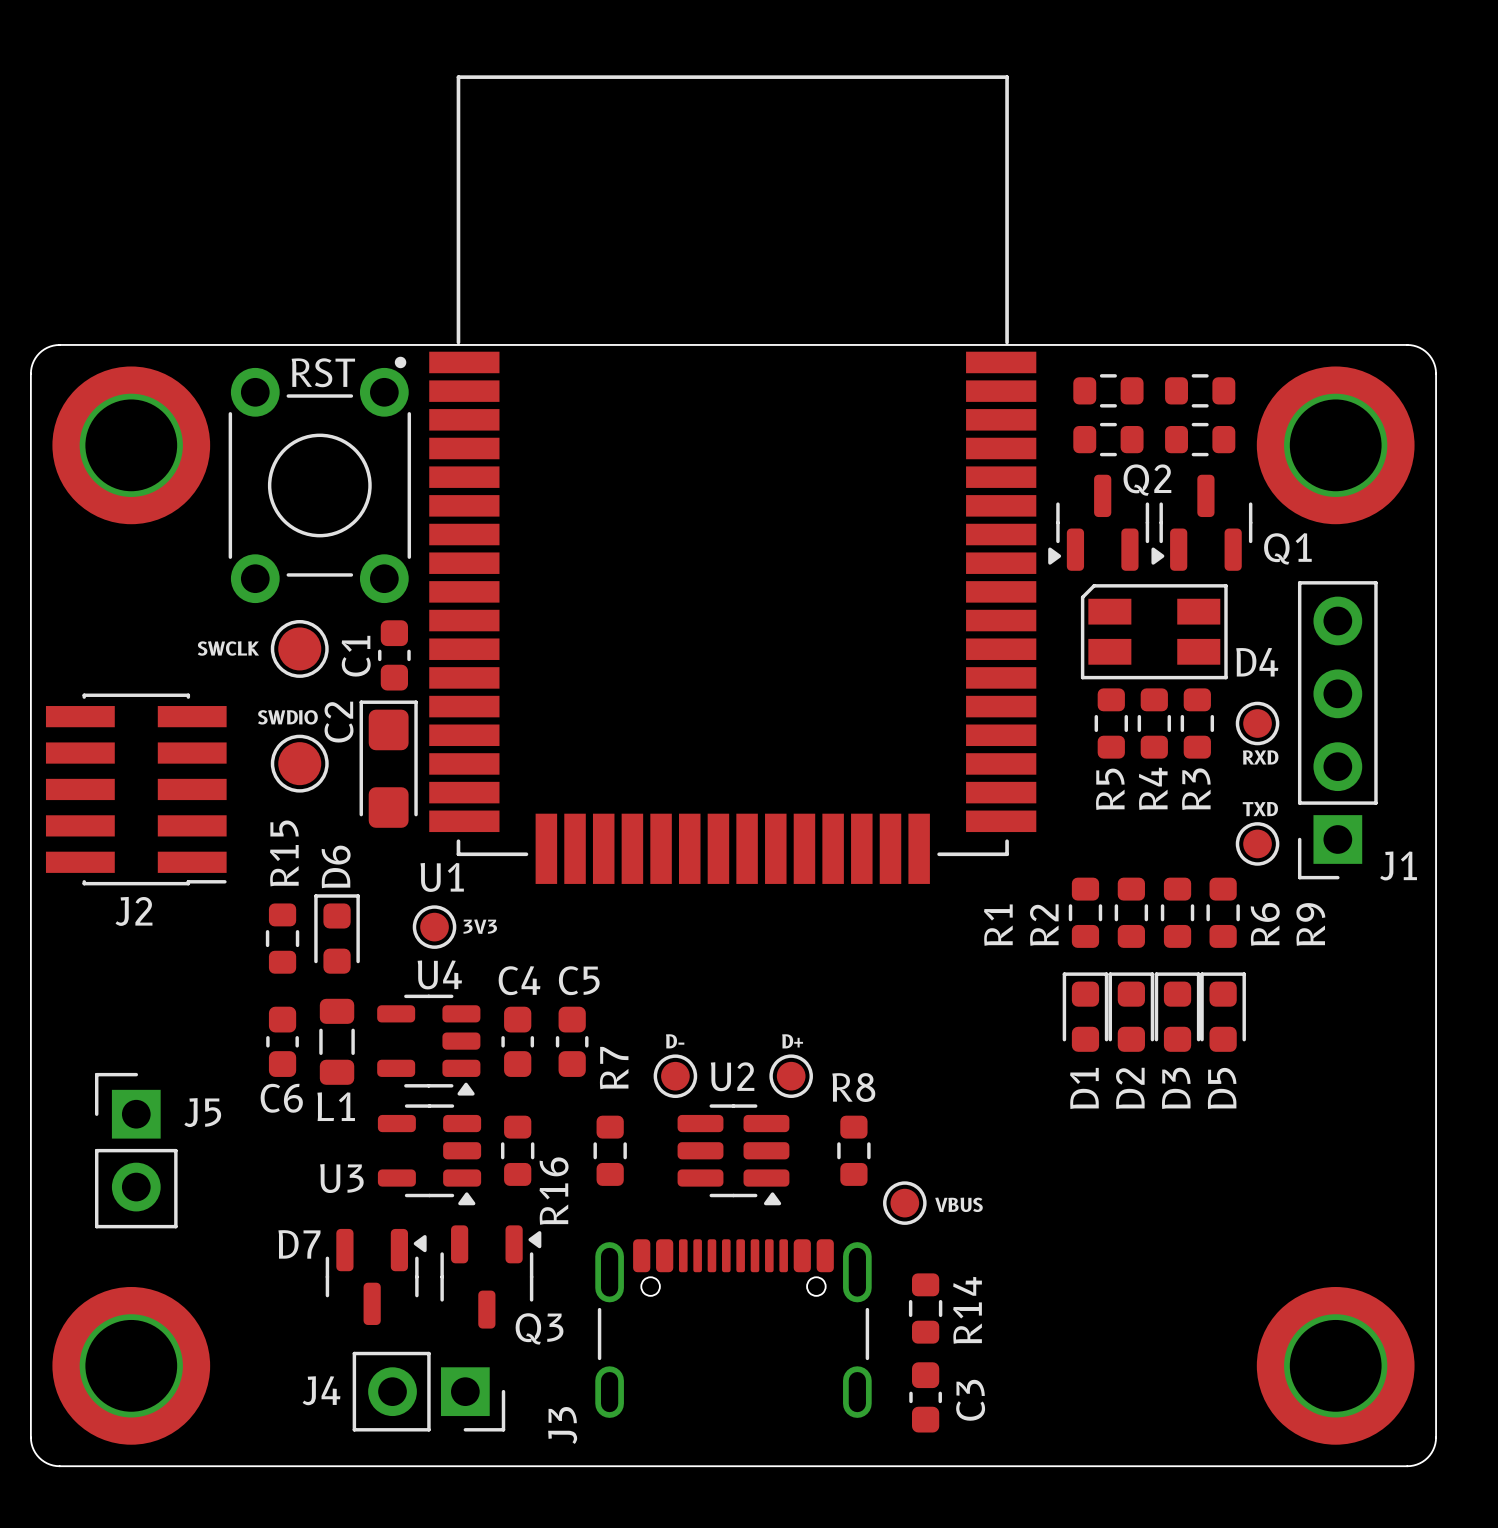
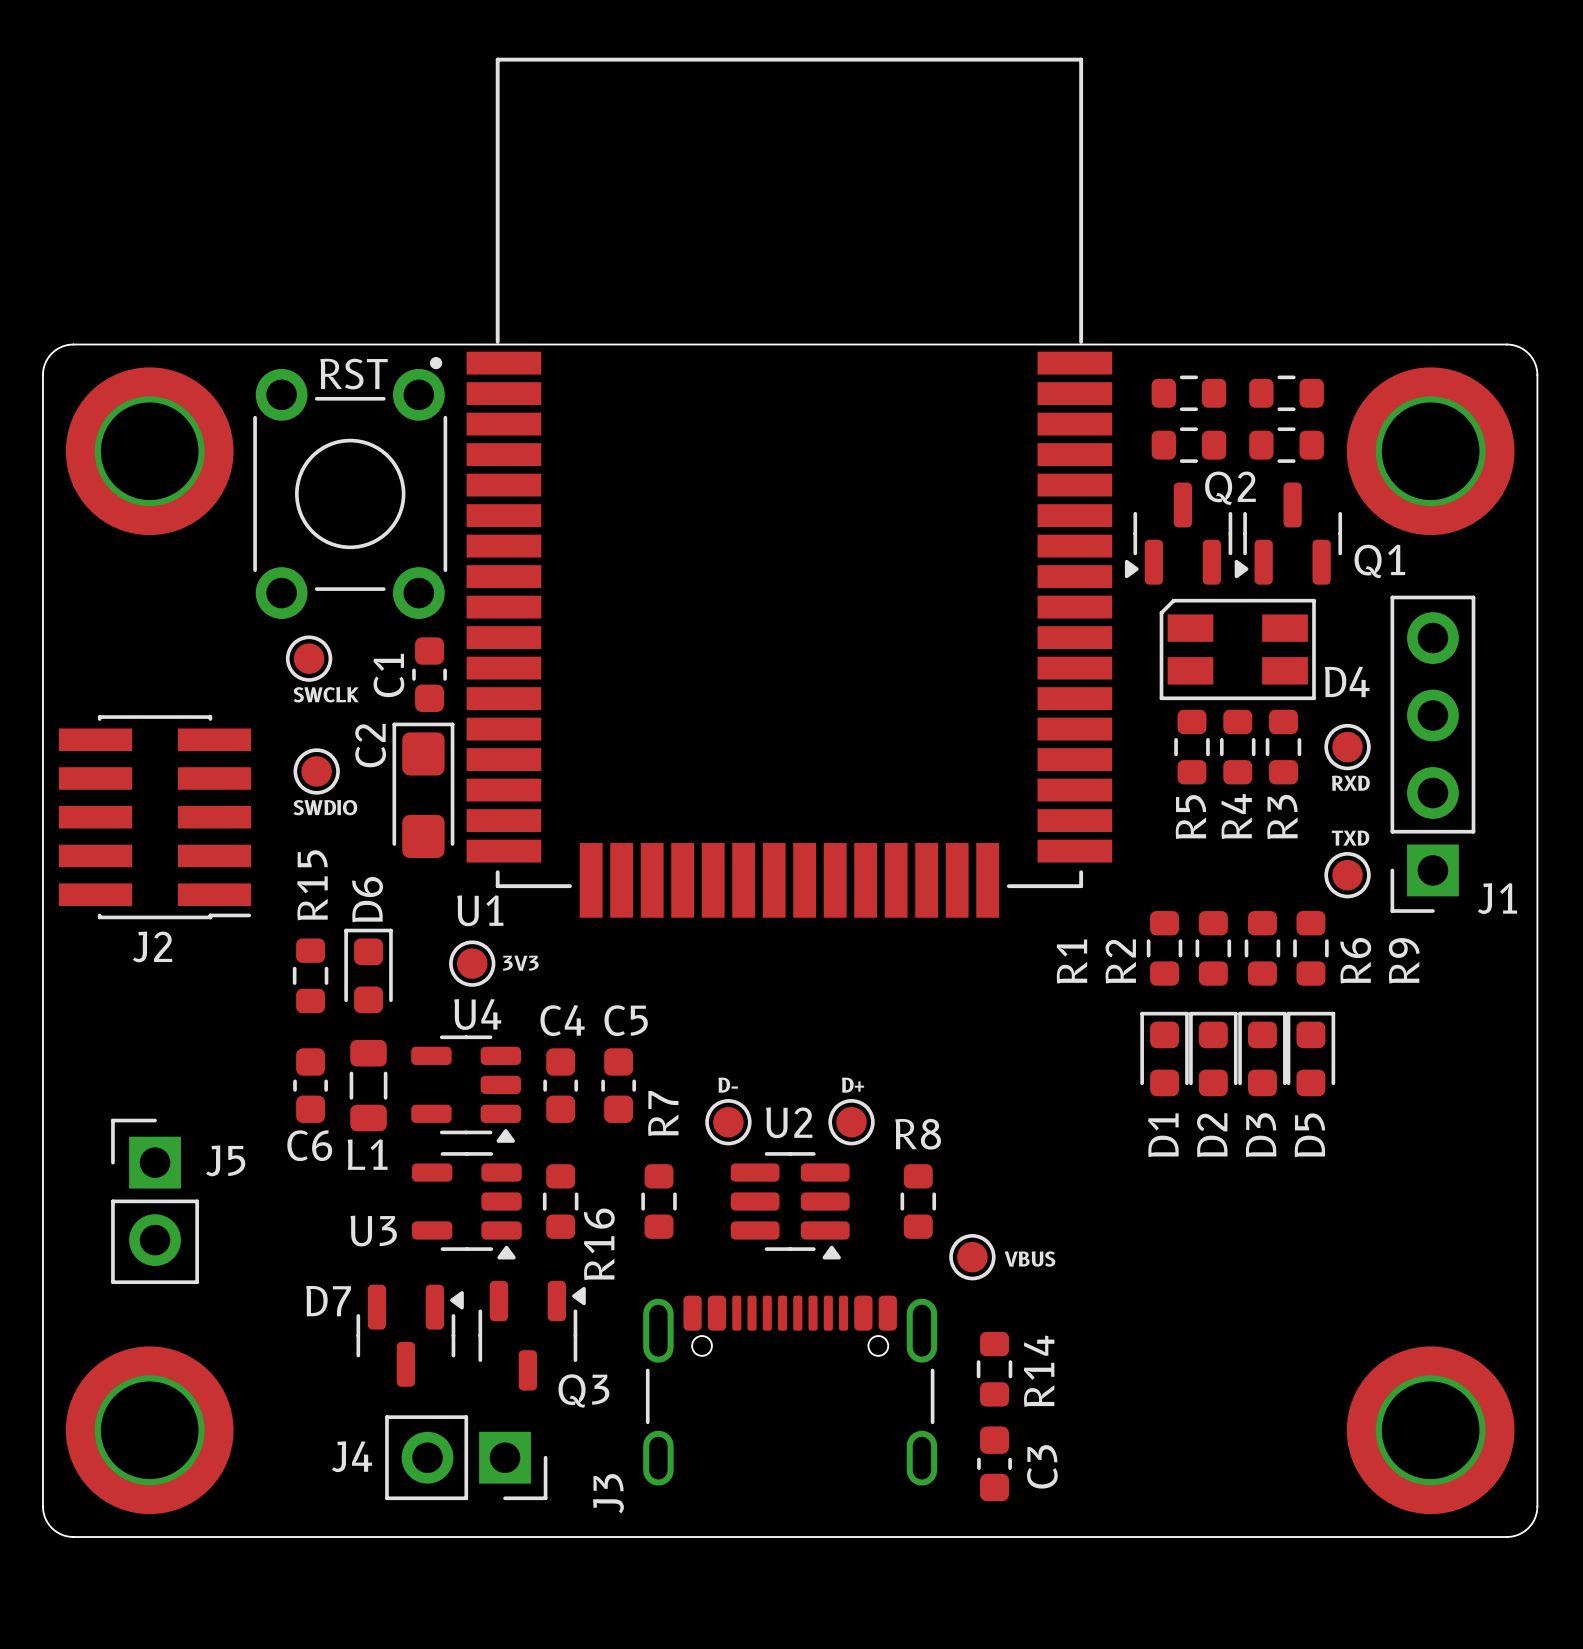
part footprint: [270, 619, 329, 678] -> [285, 635, 333, 682]
text position: SWCLK (228, 648) -> SWCLK (326, 694)
text position: SWDIO (287, 717) -> SWDIO (325, 807)
part footprint: [270, 734, 329, 793] -> [293, 748, 340, 795]

